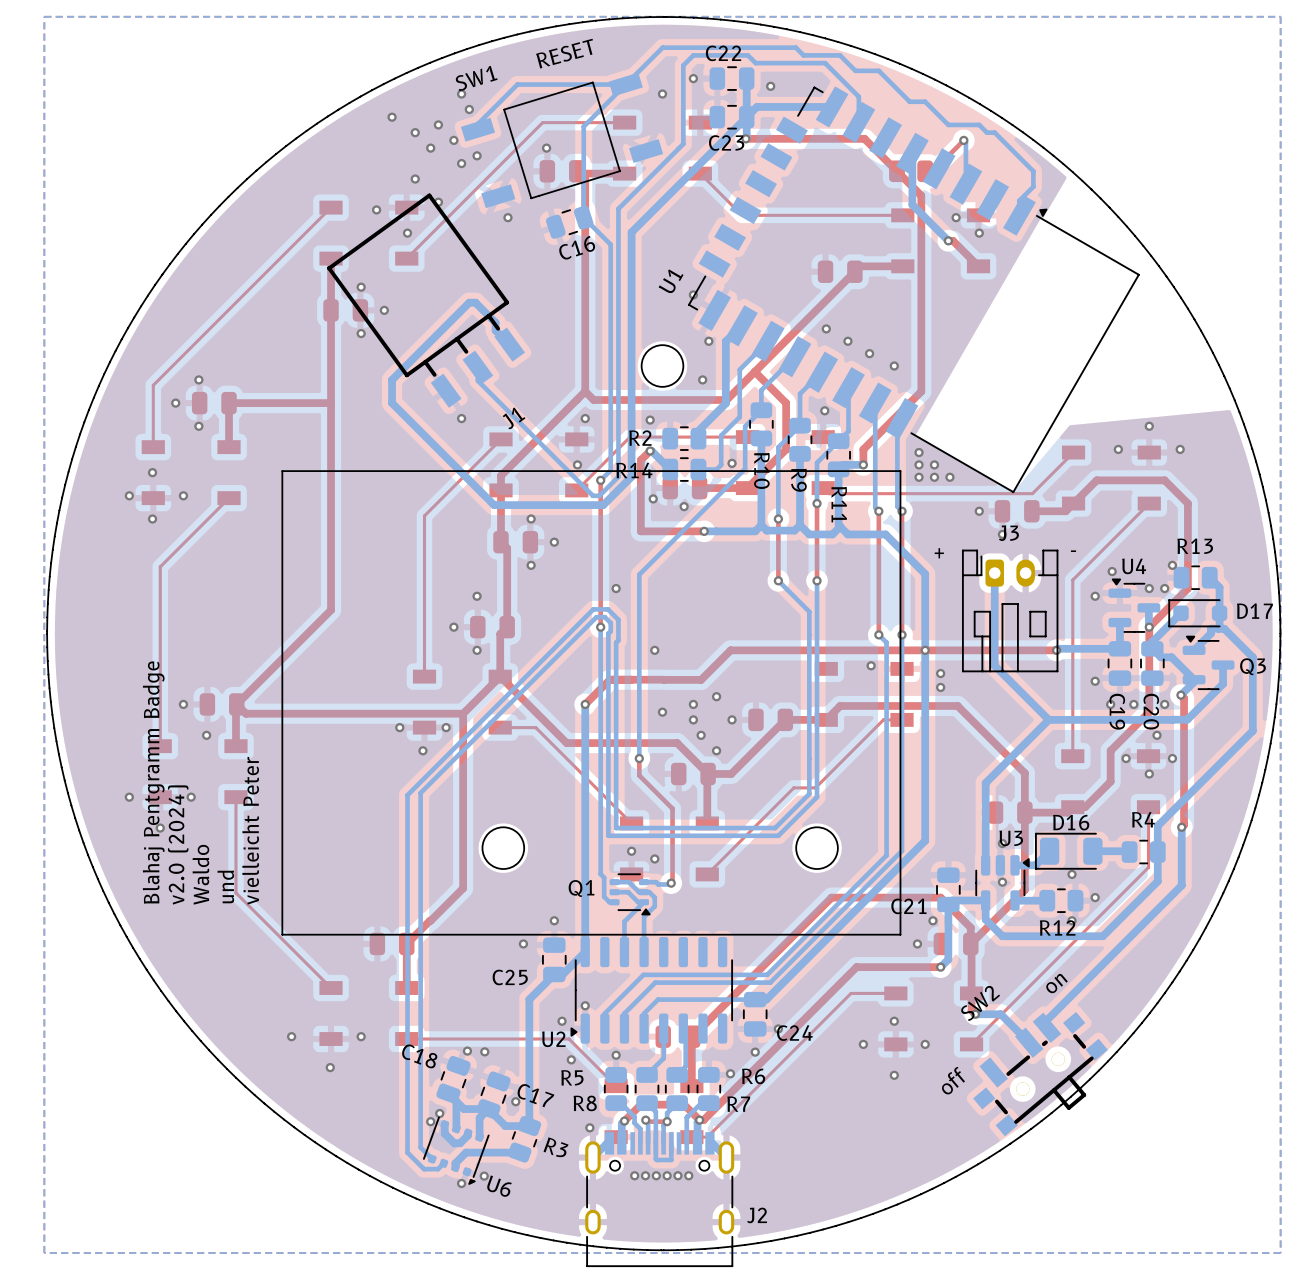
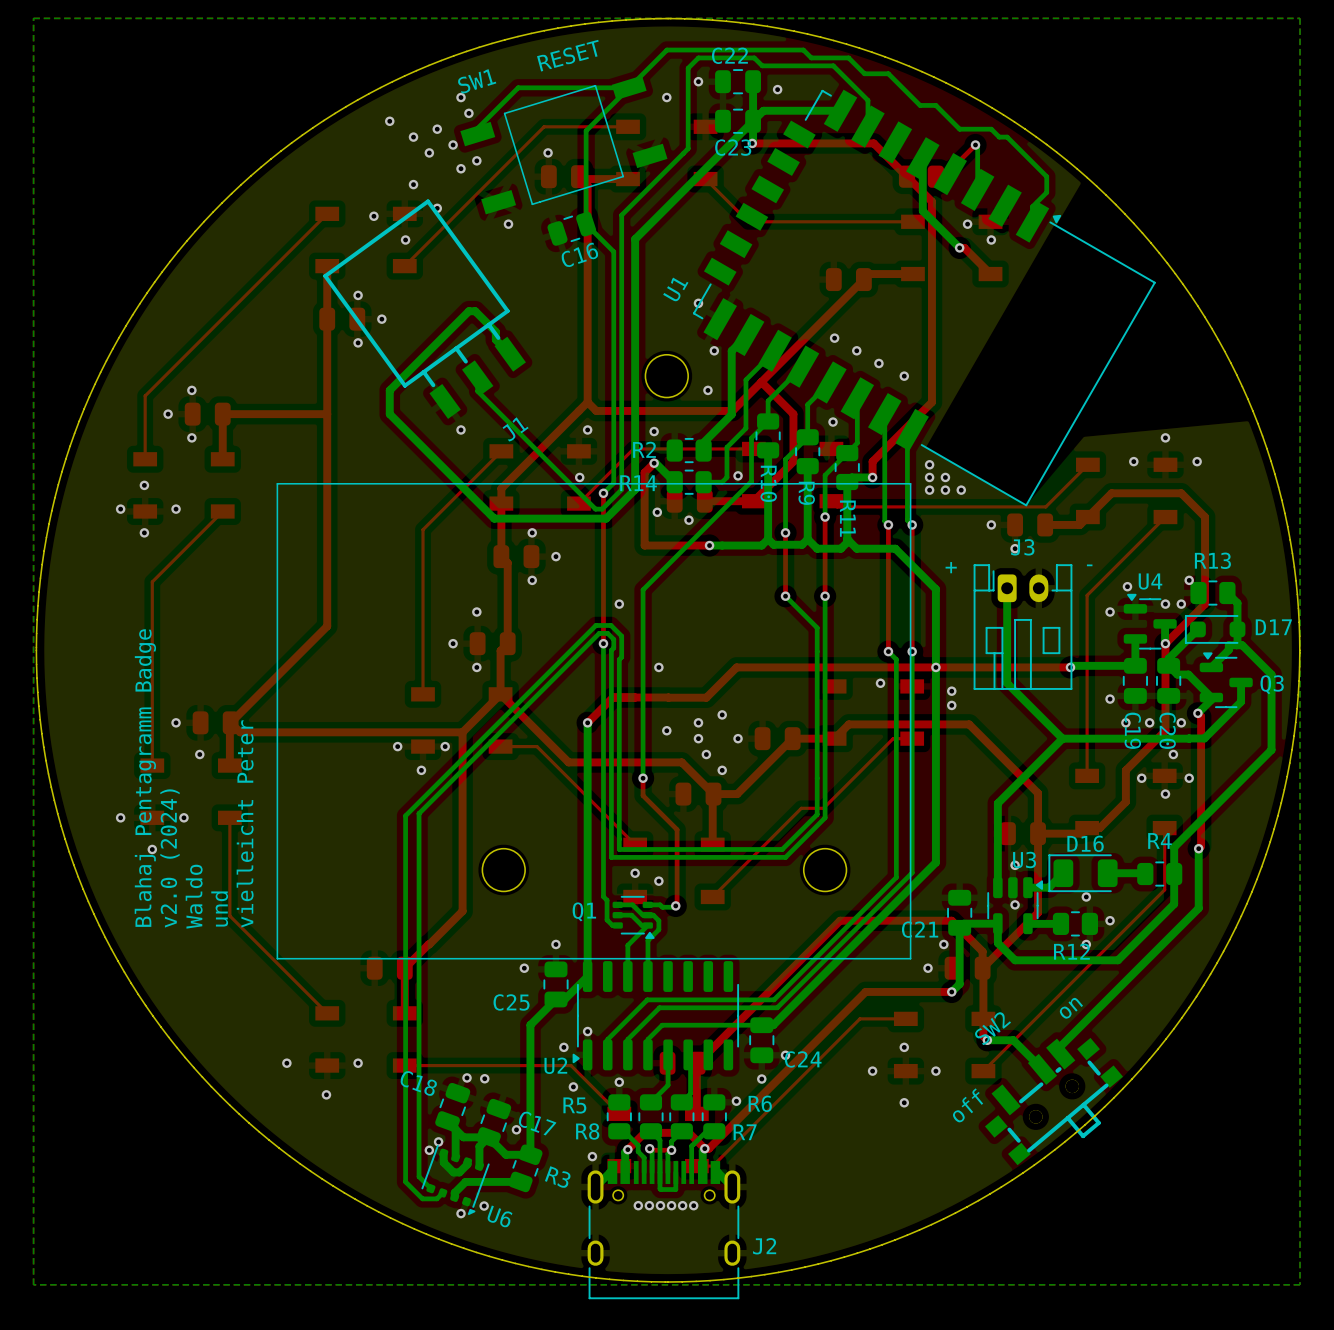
text: Blahaj Pentgramm Badge (153, 782) -> Blahaj Pentagramm Badge (145, 778)

